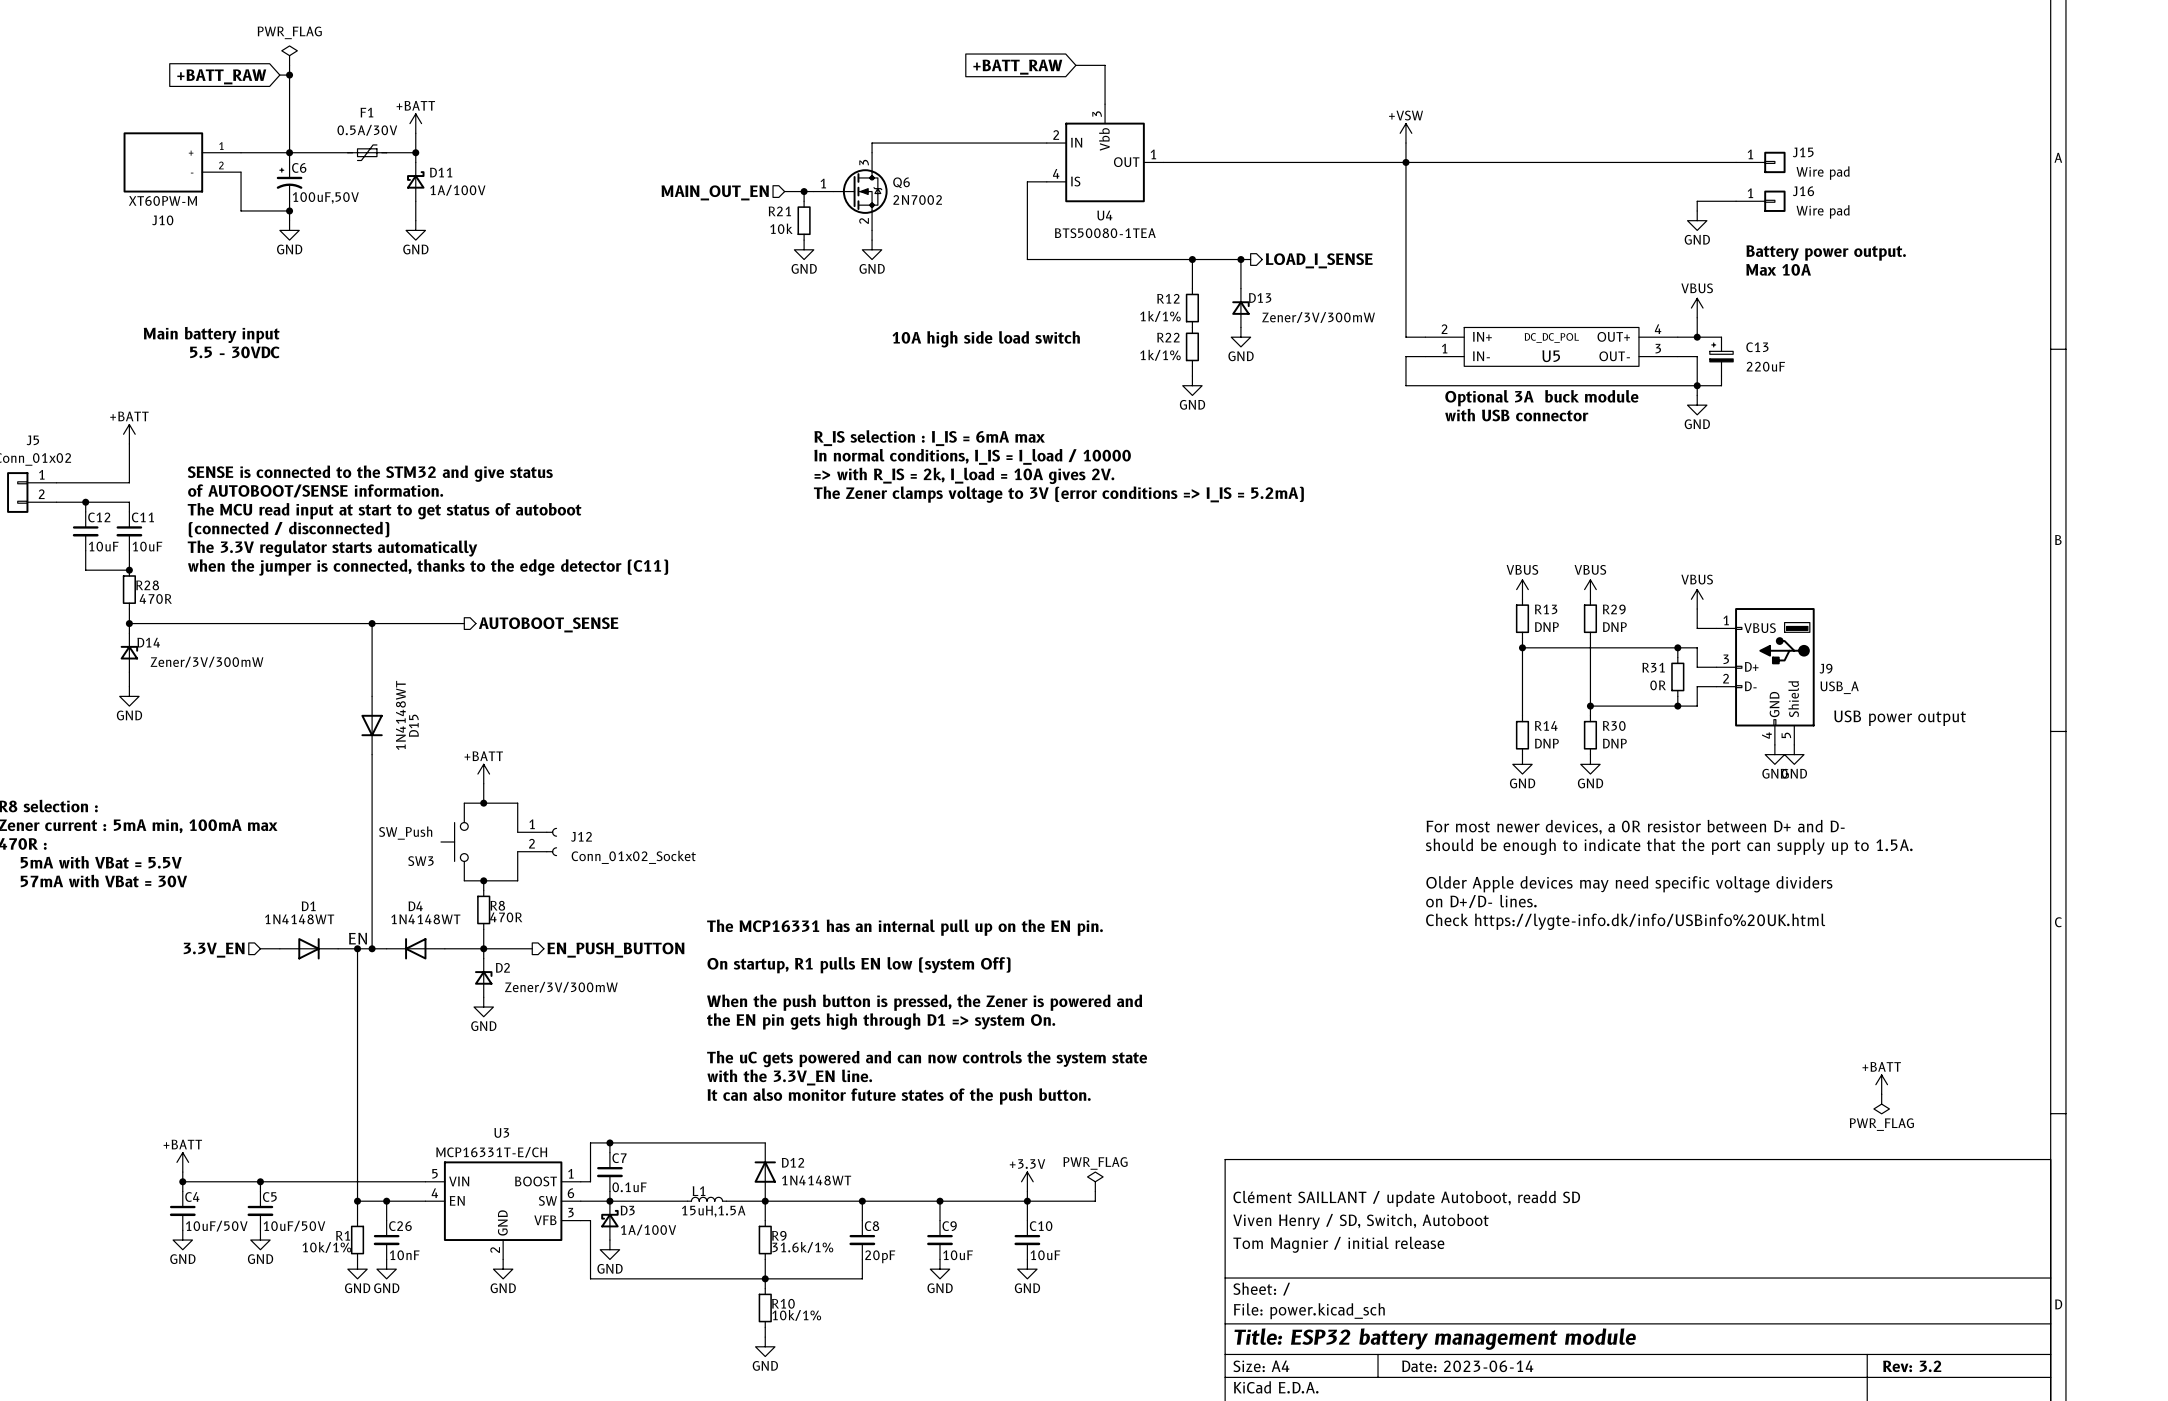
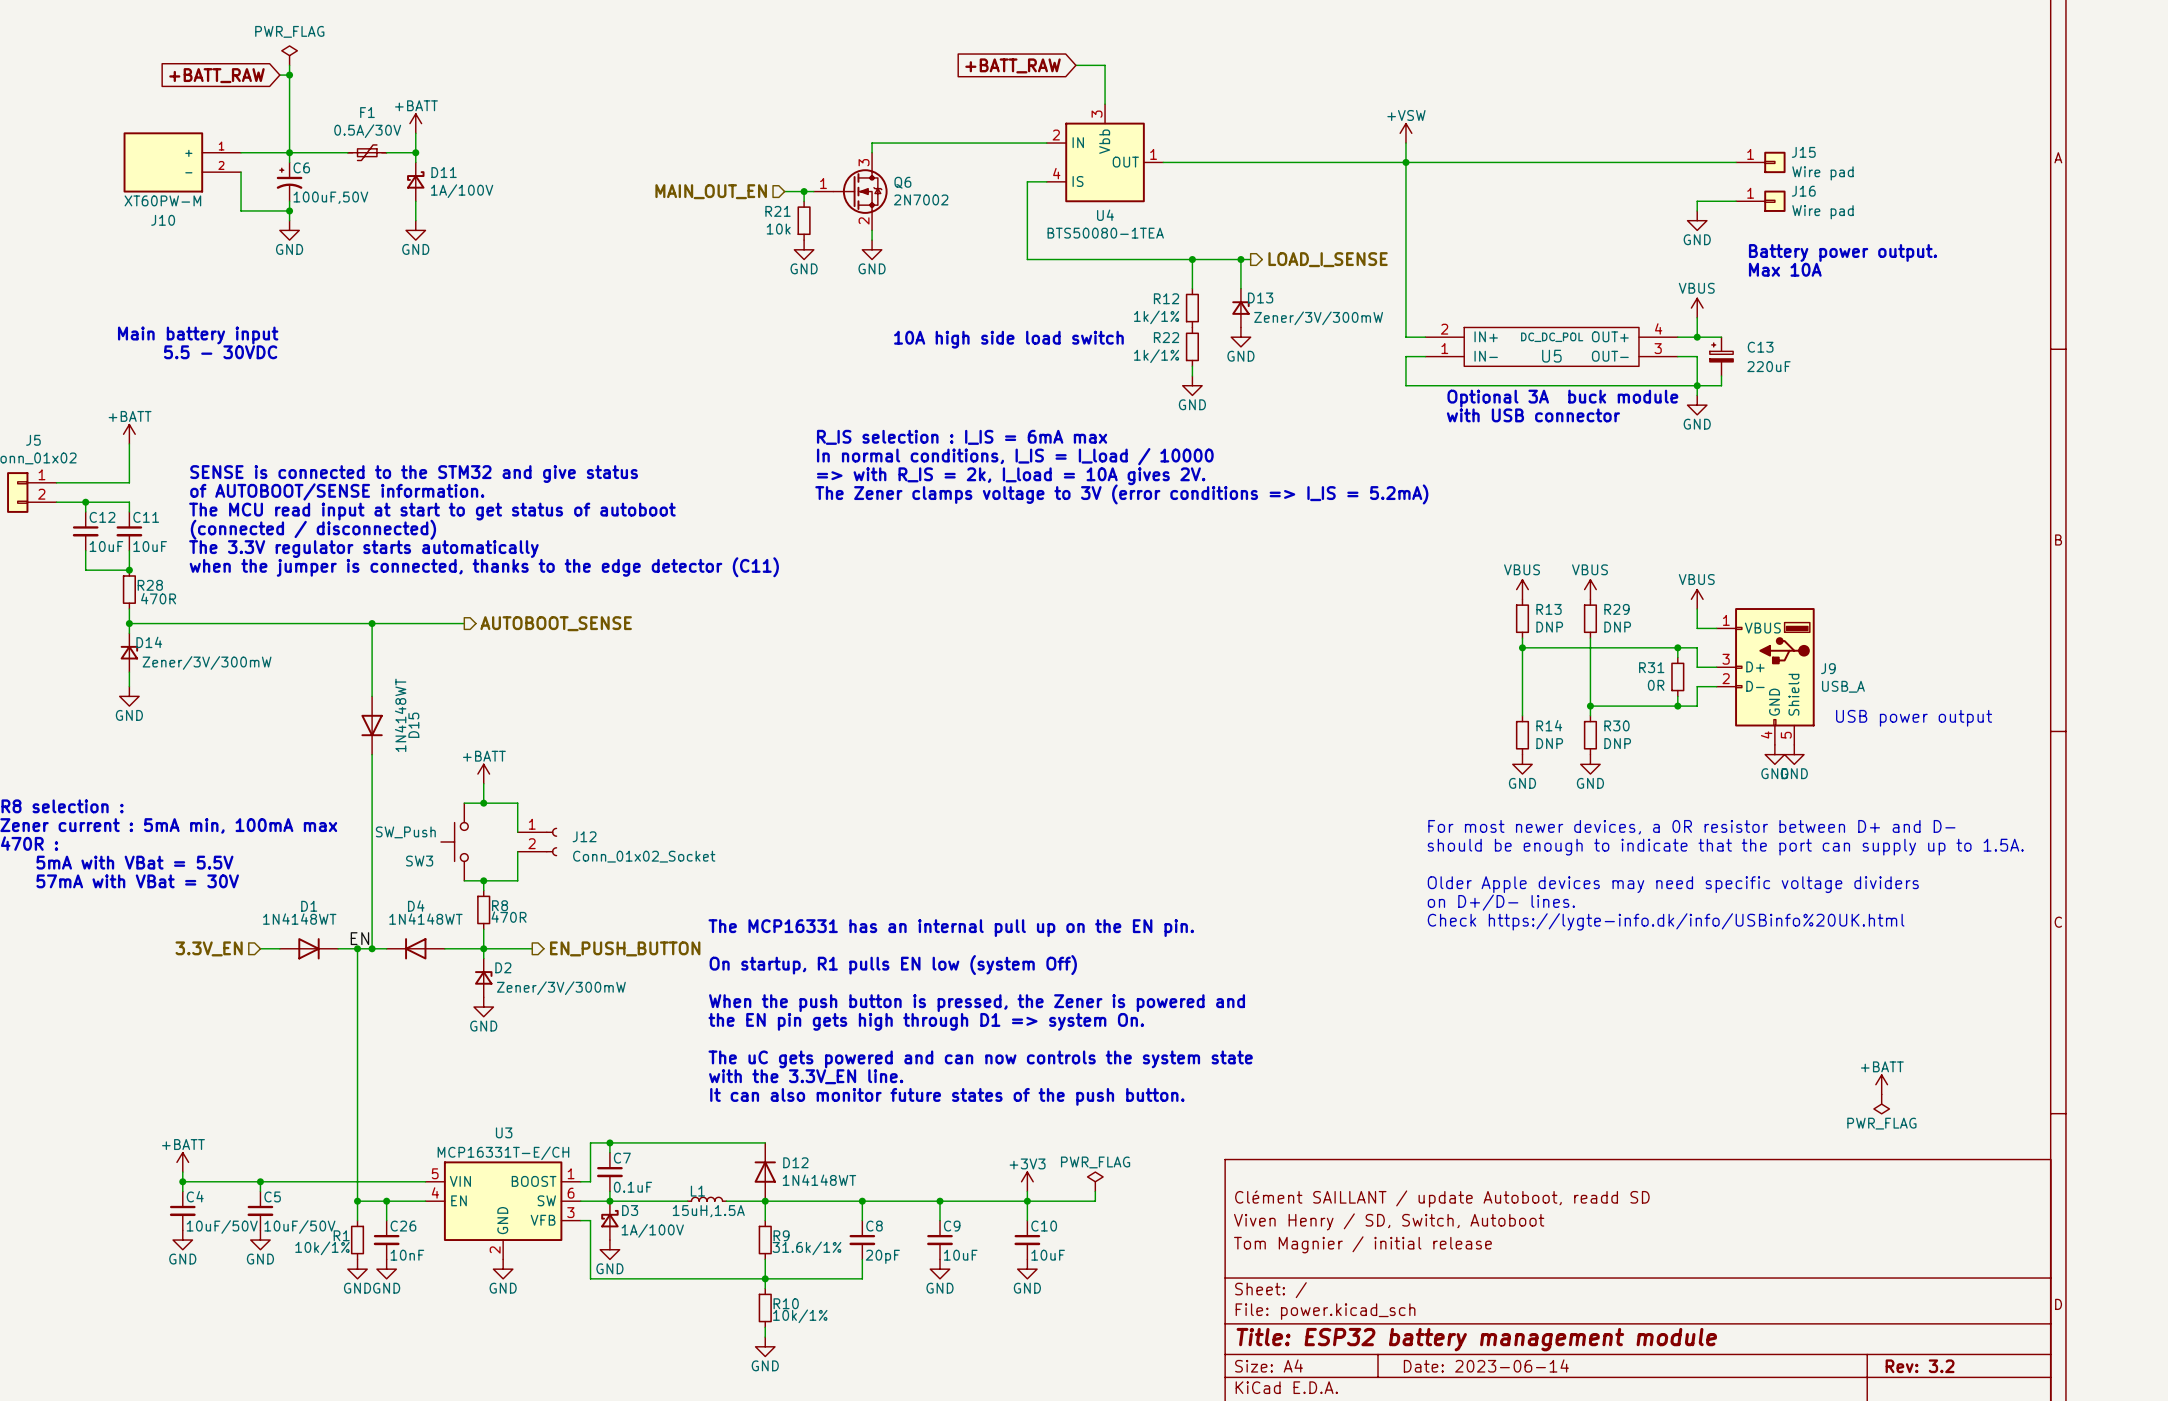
power symbol: +3.3V (1027, 1181) -> +3V3 (1027, 1181)

